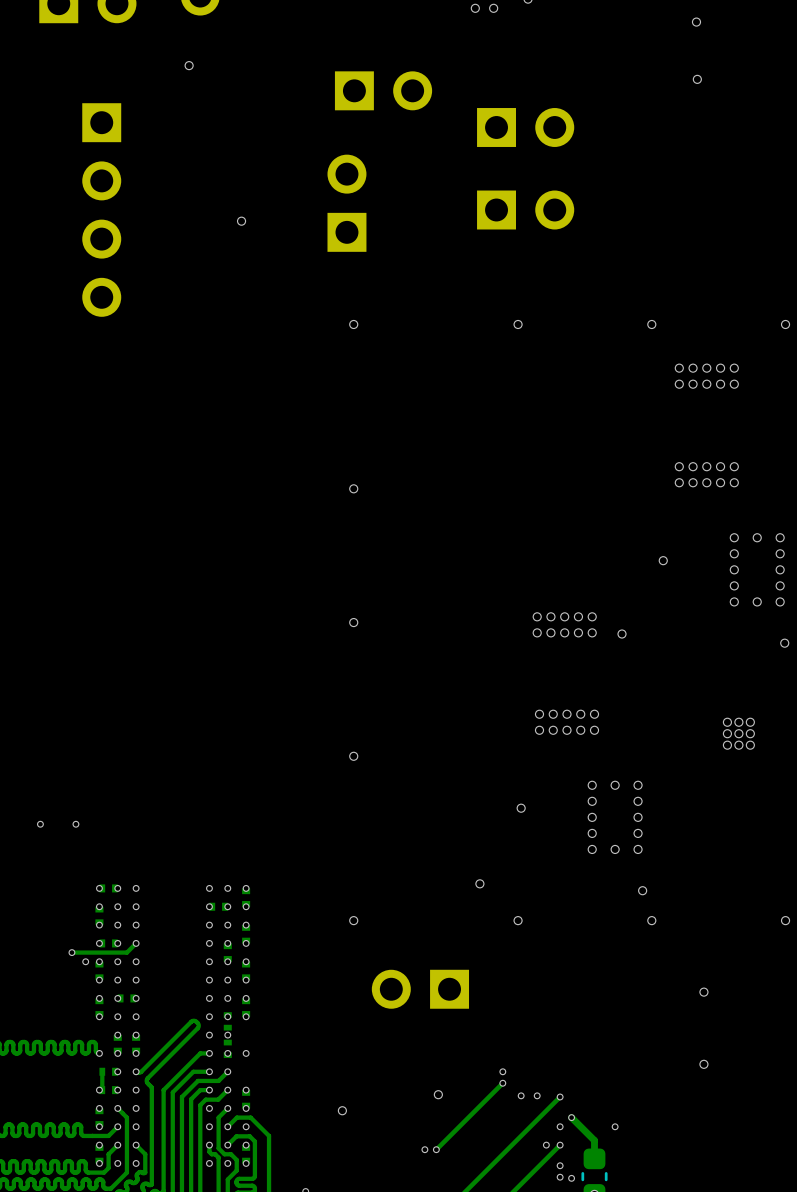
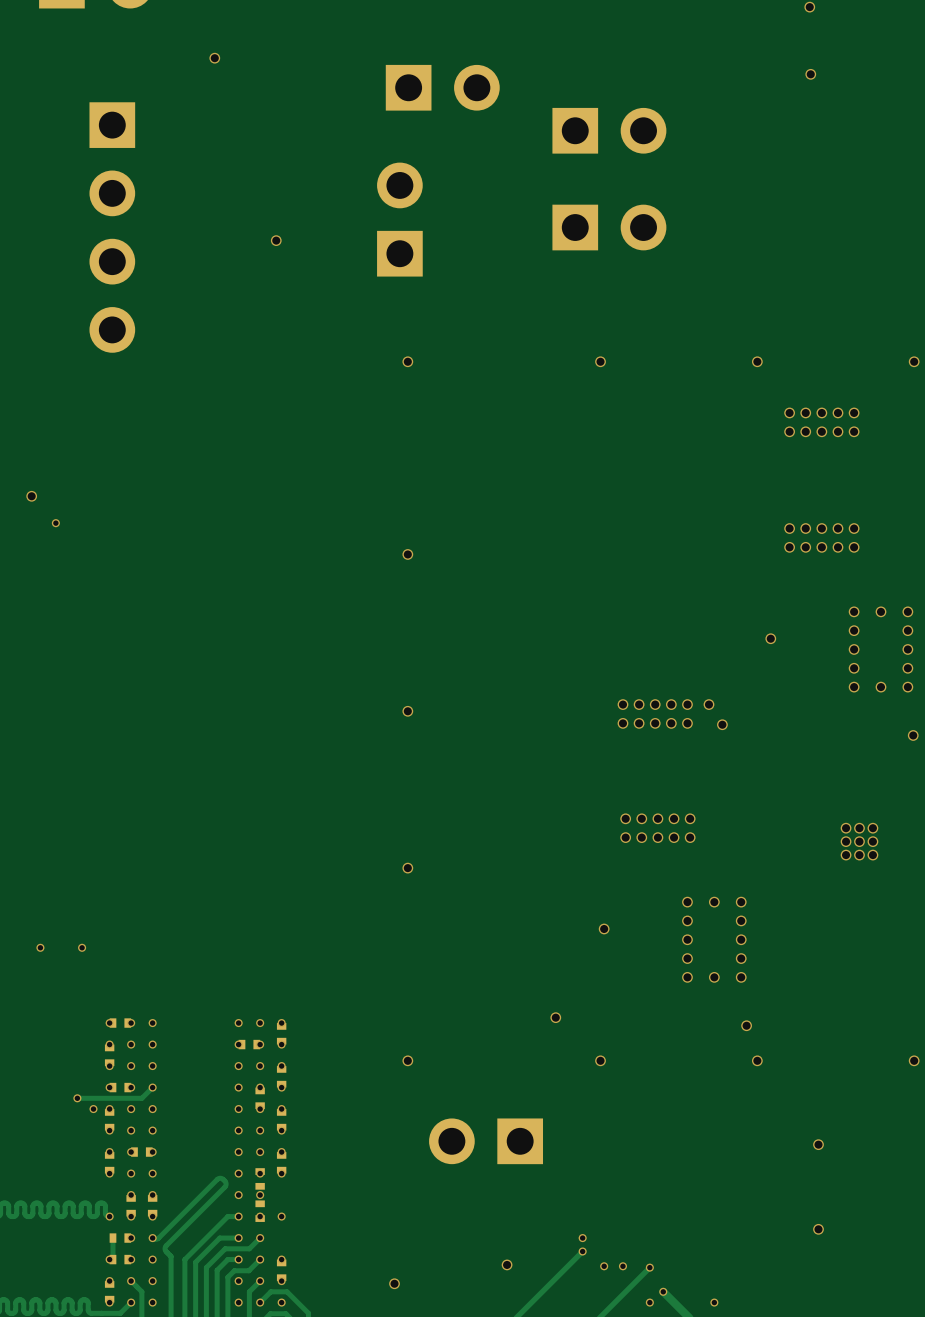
via: none -> (31, 496)
via: none -> (55, 523)
via: none -> (708, 704)

